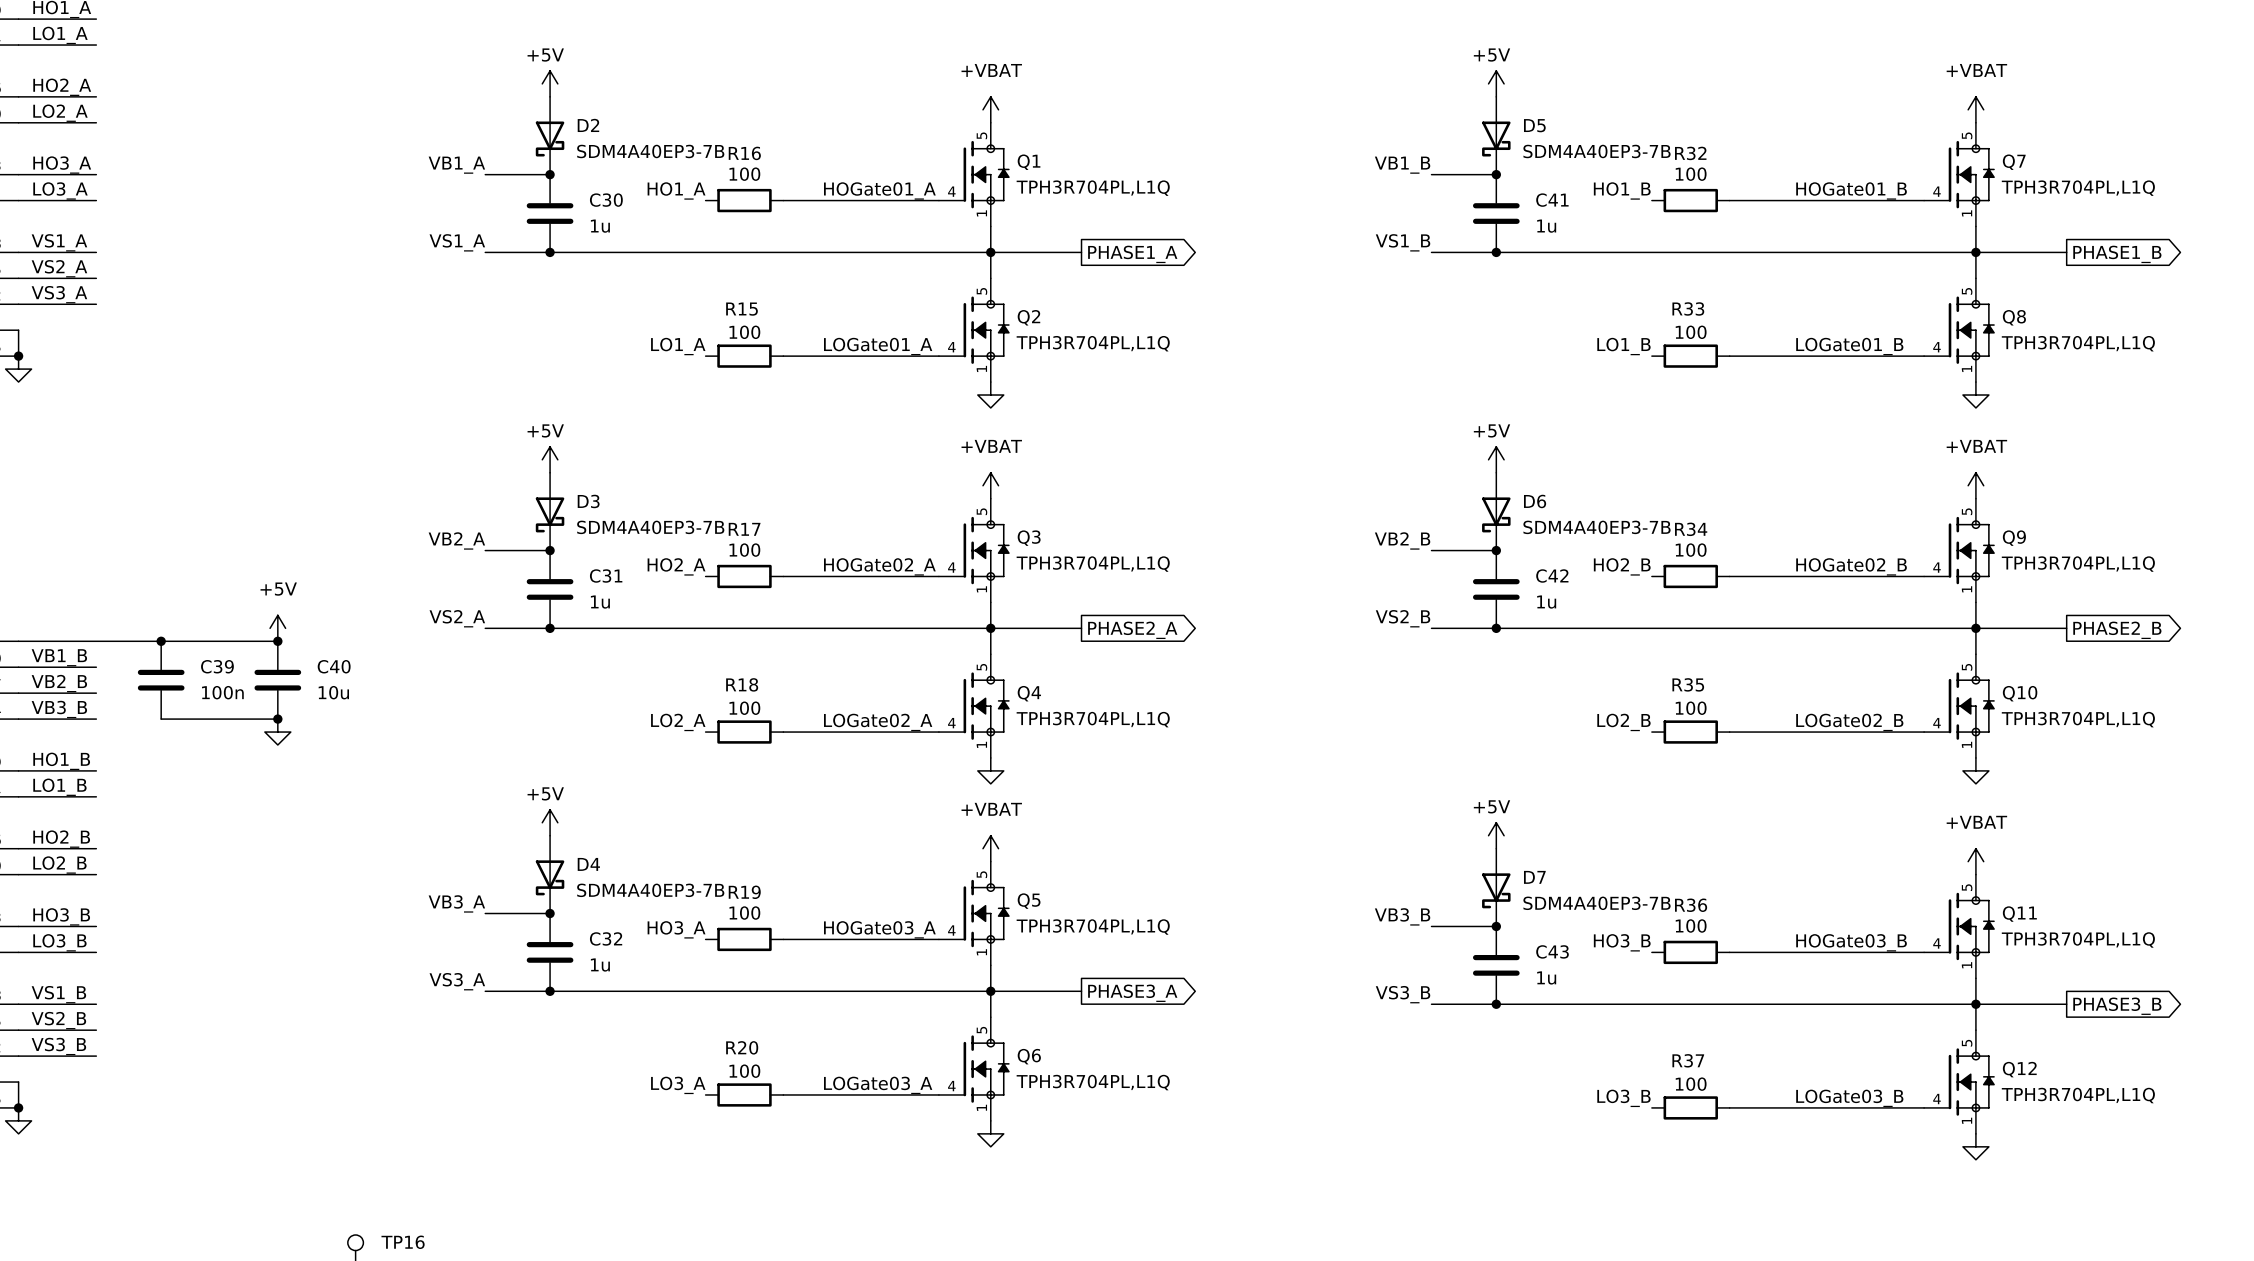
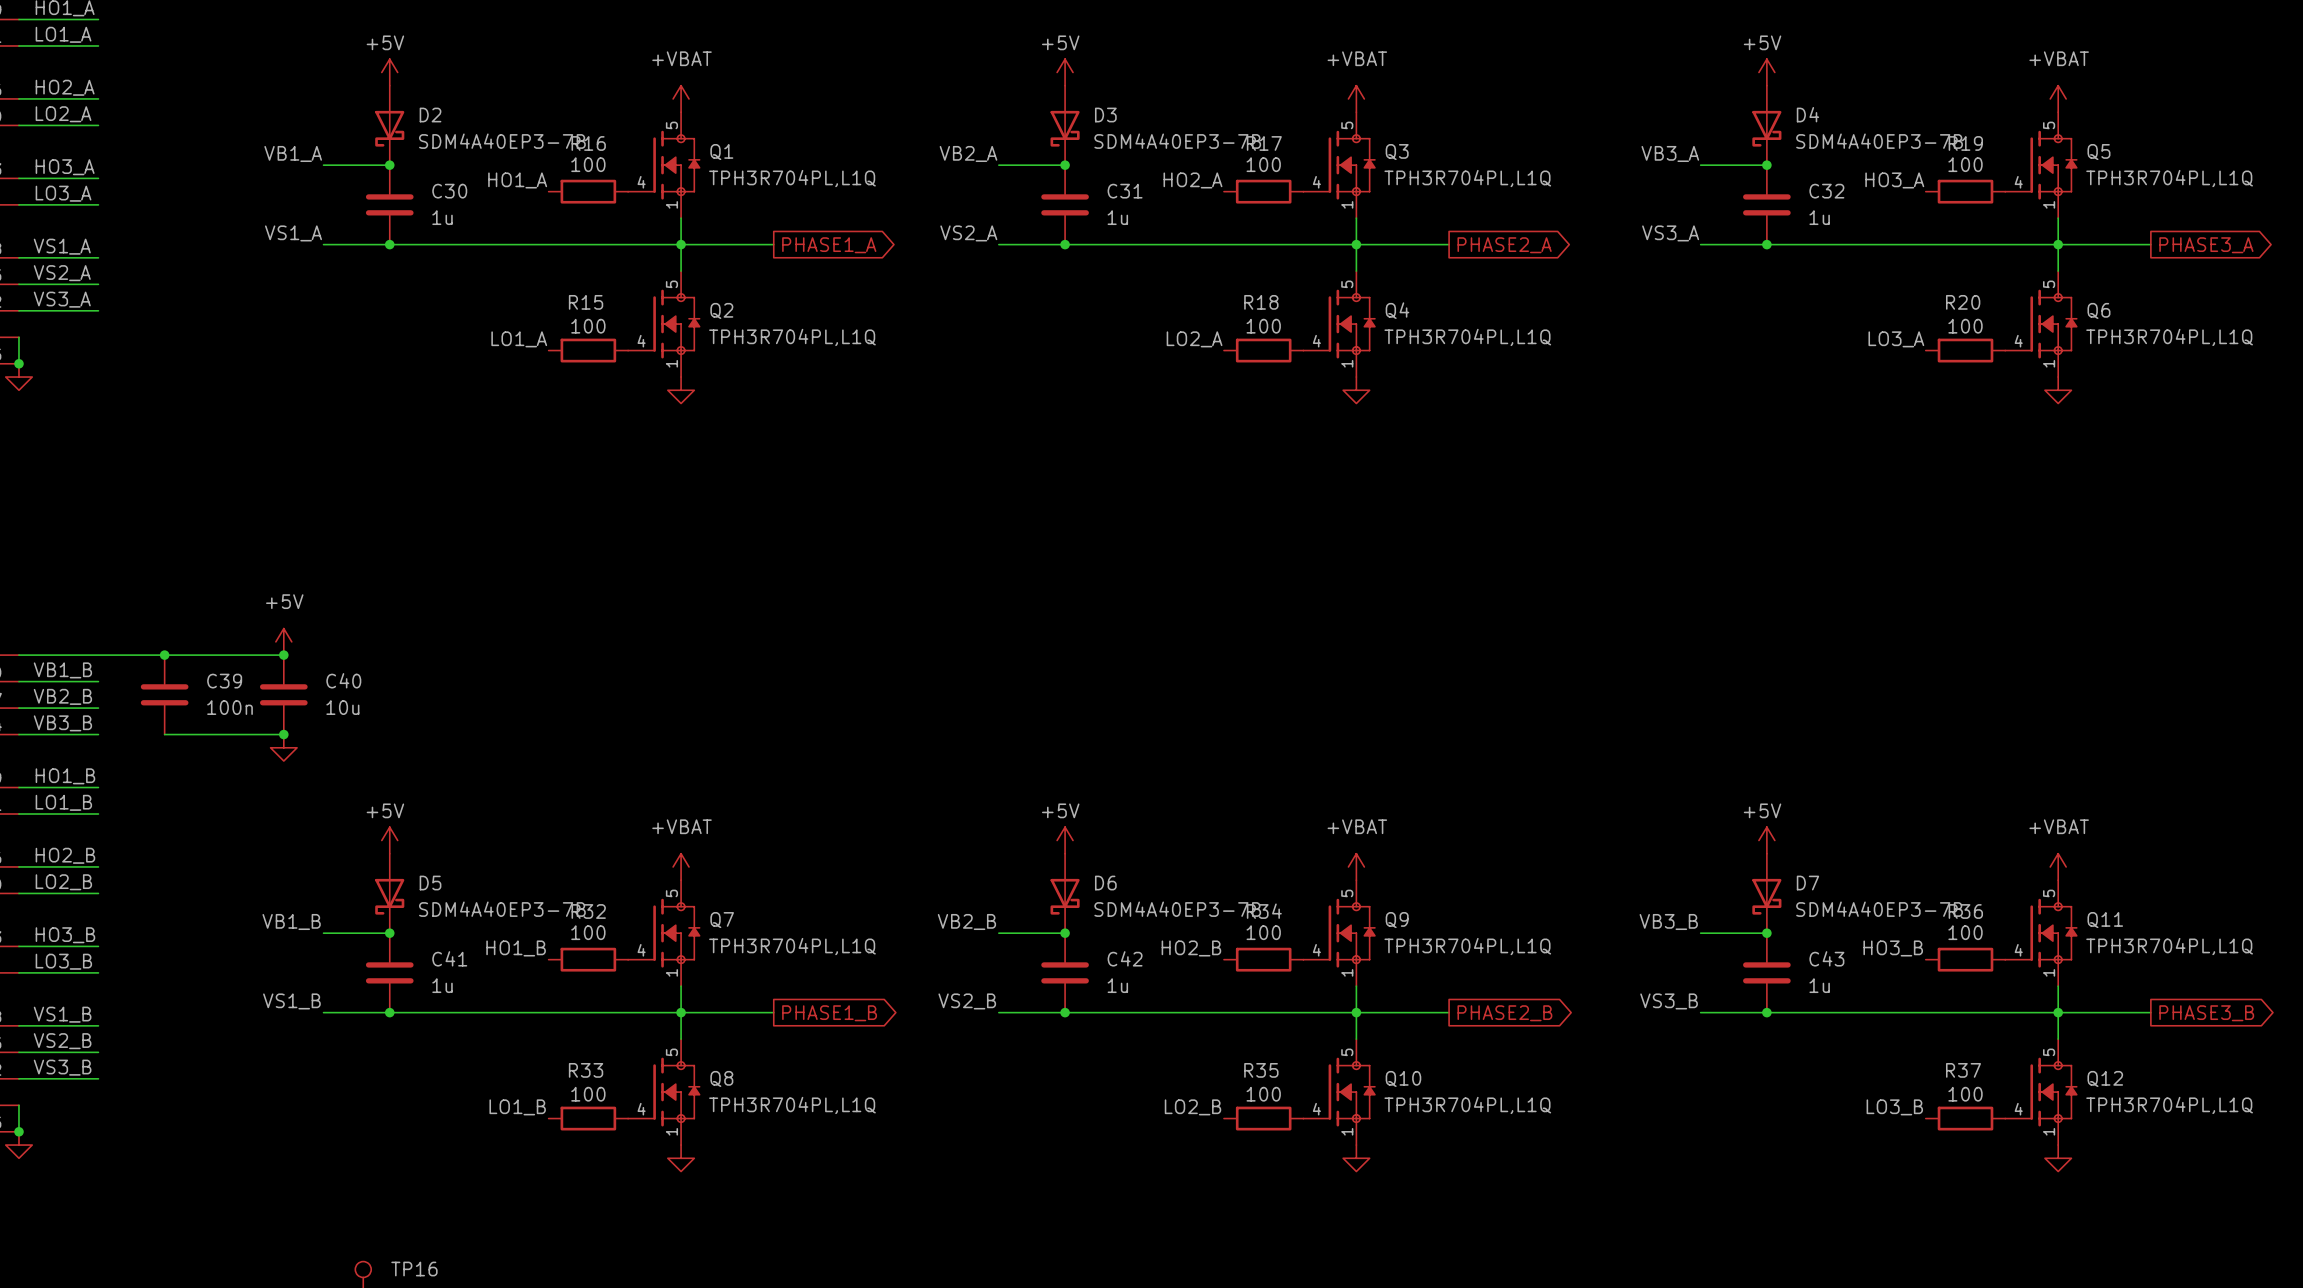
power symbol: none -> +5V (1065, 72)
power symbol: none -> +5V (1766, 72)
power symbol position: +5V (550, 83) -> +5V (389, 72)
power symbol: +5V (1496, 83) -> none
power symbol: none -> +VBAT (681, 98)
power symbol: none -> +VBAT (1356, 98)
power symbol: +VBAT (990, 109) -> none
power symbol position: +VBAT (1975, 109) -> +VBAT (2058, 98)
D2 position: (550, 135) -> (389, 125)
D5 position: (1496, 135) -> (389, 893)
label: none -> VB2_A (968, 153)
label: none -> VB3_A (1670, 153)
junction: none -> (389, 165)
wire: none -> (998, 165) (1065, 165)
junction: none -> (1065, 165)
junction: none -> (1766, 165)
label position: VB1_A (456, 165) -> VB1_A (293, 153)
label: VB1_B (1402, 165) -> none
wire: (485, 174) (550, 174) -> (323, 165) (389, 165)
junction: (550, 174) -> none
Q1 position: (974, 174) -> (664, 165)
wire: (1431, 174) (1496, 174) -> (1700, 165) (1766, 165)
junction: (1496, 174) -> none
Q7 position: (1959, 174) -> (664, 933)
label: none -> HO2_A (1192, 180)
label: none -> HO3_A (1894, 180)
label position: HO1_A (676, 190) -> HO1_A (517, 180)
label: HOGate01_A (879, 190) -> none
label: HO1_B (1622, 190) -> none
label: HOGate01_B (1851, 190) -> none
R16 position: (744, 200) -> (588, 191)
wire: (783, 200) (938, 200) -> none
R32 position: (1690, 200) -> (588, 959)
wire: (1729, 200) (1924, 200) -> none
C30 position: (550, 213) -> (389, 204)
wire: none -> (681, 218) (681, 271)
wire: none -> (1356, 218) (1356, 271)
C41 position: (1496, 213) -> (389, 972)
wire: (990, 226) (990, 278) -> none
wire: (1975, 226) (1975, 278) -> (2058, 218) (2058, 271)
label: none -> VS2_A (968, 233)
label: none -> VS3_A (1670, 233)
wire: none -> (323, 244) (773, 244)
junction: none -> (389, 244)
junction: none -> (681, 244)
wire: none -> (998, 244) (1449, 244)
junction: none -> (1065, 244)
junction: none -> (1356, 244)
wire: none -> (1700, 244) (2150, 244)
junction: none -> (1766, 244)
global label: none -> PHASE1_A (829, 245)
global label: none -> PHASE2_A (1504, 245)
label position: VS1_A (457, 242) -> VS1_A (293, 233)
label: VS1_B (1403, 242) -> none
wire: (485, 252) (1081, 252) -> none
junction: (550, 252) -> none
junction: (990, 252) -> none
wire: (1431, 252) (2066, 252) -> none
junction: (1496, 252) -> none
junction position: (1975, 252) -> (2058, 244)
global label: PHASE1_A (1132, 254) -> none
global label: PHASE1_B (2117, 254) -> PHASE3_A (2206, 245)
Q2 position: (974, 330) -> (664, 324)
Q8 position: (1959, 330) -> (664, 1092)
label: none -> LO2_A (1194, 339)
label: none -> LO3_A (1896, 339)
label position: LO1_A (678, 346) -> LO1_A (519, 339)
label: LOGate01_A (878, 346) -> none
label: LO1_B (1623, 346) -> none
label: LOGate01_B (1849, 346) -> none
R15 position: (744, 356) -> (588, 350)
wire: (783, 356) (938, 356) -> none
R33 position: (1690, 356) -> (588, 1118)
wire: (1729, 356) (1924, 356) -> none
power symbol: none -> (681, 390)
power symbol: none -> (1356, 390)
power symbol: (990, 395) -> none
power symbol position: (1975, 395) -> (2058, 390)
power symbol: +5V (550, 459) -> none
power symbol: +5V (1496, 459) -> none
power symbol: +VBAT (990, 485) -> none
power symbol: +VBAT (1975, 485) -> none
D3 position: (550, 511) -> (1065, 125)
D6 position: (1496, 511) -> (1065, 893)
label: VB2_A (456, 540) -> none
label: VB2_B (1402, 540) -> none
wire: (485, 550) (550, 550) -> none
junction: (550, 550) -> none
Q3 position: (974, 550) -> (1339, 165)
wire: (1431, 550) (1496, 550) -> none
junction: (1496, 550) -> none
Q9 position: (1959, 550) -> (1339, 933)
label: HO2_A (676, 566) -> none
label: HOGate02_A (879, 566) -> none
label: HO2_B (1622, 566) -> none
label: HOGate02_B (1851, 566) -> none
R17 position: (744, 576) -> (1263, 191)
wire: (783, 576) (938, 576) -> none
R34 position: (1690, 576) -> (1263, 959)
wire: (1729, 576) (1924, 576) -> none
C31 position: (550, 589) -> (1065, 204)
C42 position: (1496, 589) -> (1065, 972)
wire: (990, 602) (990, 654) -> none
wire: (1975, 602) (1975, 654) -> none
label: VS2_A (457, 618) -> none
label: VS2_B (1403, 618) -> none
wire: (485, 628) (1081, 628) -> none
junction: (550, 628) -> none
junction: (990, 628) -> none
wire: (1431, 628) (2066, 628) -> none
junction: (1496, 628) -> none
junction: (1975, 628) -> none
global label: PHASE2_A (1132, 630) -> none
global label: PHASE2_B (2117, 630) -> none
Q4 position: (974, 706) -> (1339, 324)
Q10 position: (1959, 706) -> (1339, 1092)
label: LO2_A (678, 722) -> none
label: LOGate02_A (878, 722) -> none
label: LO2_B (1623, 722) -> none
label: LOGate02_B (1849, 722) -> none
R18 position: (744, 732) -> (1263, 350)
wire: (783, 732) (938, 732) -> none
R35 position: (1690, 732) -> (1263, 1118)
wire: (1729, 732) (1924, 732) -> none
power symbol: (990, 770) -> none
power symbol: (1975, 770) -> none
power symbol position: +5V (550, 822) -> +5V (389, 840)
power symbol: none -> +5V (1065, 840)
power symbol: none -> +5V (1766, 840)
power symbol: +5V (1496, 835) -> none
power symbol: none -> +VBAT (681, 866)
power symbol: +VBAT (990, 848) -> none
power symbol: none -> +VBAT (1356, 866)
power symbol position: +VBAT (1975, 861) -> +VBAT (2058, 866)
D4 position: (550, 874) -> (1766, 125)
D7 position: (1496, 887) -> (1766, 893)
label: VB3_A (456, 903) -> none
label: none -> VB2_B (966, 921)
label: none -> VB1_B (291, 921)
junction: none -> (389, 933)
wire: (485, 913) (550, 913) -> (323, 933) (389, 933)
junction: (550, 913) -> none
Q5 position: (974, 913) -> (2041, 165)
wire: none -> (998, 933) (1065, 933)
junction: none -> (1065, 933)
junction: none -> (1766, 933)
label position: VB3_B (1402, 916) -> VB3_B (1668, 921)
wire: (1431, 926) (1496, 926) -> (1700, 933) (1766, 933)
junction: (1496, 926) -> none
Q11 position: (1959, 926) -> (2041, 933)
label: none -> HO1_B (516, 948)
label: HO3_A (676, 929) -> none
label: HOGate03_A (879, 929) -> none
label: none -> HO2_B (1191, 948)
R19 position: (744, 939) -> (1965, 191)
wire: (783, 939) (938, 939) -> none
label position: HO3_B (1622, 942) -> HO3_B (1893, 948)
label: HOGate03_B (1851, 942) -> none
C32 position: (550, 952) -> (1766, 204)
R36 position: (1690, 952) -> (1965, 959)
wire: (1729, 952) (1924, 952) -> none
wire: none -> (681, 986) (681, 1039)
wire: (990, 965) (990, 1017) -> none
wire: none -> (1356, 986) (1356, 1039)
C43 position: (1496, 965) -> (1766, 972)
wire: (1975, 978) (1975, 1030) -> (2058, 986) (2058, 1039)
label: none -> VS1_B (291, 1001)
label: VS3_A (457, 981) -> none
label: none -> VS2_B (967, 1001)
wire: none -> (323, 1012) (495, 1012)
junction: none -> (389, 1012)
junction: (550, 991) -> none
junction: none -> (681, 1012)
wire: (757, 991) (977, 991) -> none
junction: (990, 991) -> none
junction: none -> (1065, 1012)
wire: none -> (1104, 1012) (1449, 1012)
junction: none -> (1356, 1012)
wire: none -> (1700, 1012) (2150, 1012)
junction: none -> (1766, 1012)
global label: none -> PHASE1_B (829, 1013)
global label: PHASE3_A (1132, 993) -> none
global label: none -> PHASE2_B (1504, 1013)
label position: VS3_B (1403, 994) -> VS3_B (1669, 1001)
wire: (1431, 1004) (2066, 1004) -> none
junction: (1496, 1004) -> none
junction position: (1975, 1004) -> (2058, 1012)
global label position: PHASE3_B (2117, 1006) -> PHASE3_B (2206, 1013)
Q6 position: (974, 1069) -> (2041, 324)
Q12 position: (1959, 1082) -> (2041, 1092)
label: none -> LO1_B (517, 1107)
label: LO3_A (678, 1085) -> none
label: LOGate03_A (878, 1085) -> none
label: none -> LO2_B (1192, 1107)
R20 position: (744, 1094) -> (1965, 350)
wire: (783, 1094) (938, 1094) -> none
label position: LO3_B (1623, 1098) -> LO3_B (1894, 1107)
label: LOGate03_B (1849, 1098) -> none
R37 position: (1690, 1107) -> (1965, 1118)
wire: (1729, 1107) (1924, 1107) -> none
power symbol: none -> (681, 1158)
power symbol: (990, 1133) -> none
power symbol: none -> (1356, 1158)
power symbol position: (1975, 1146) -> (2058, 1158)

